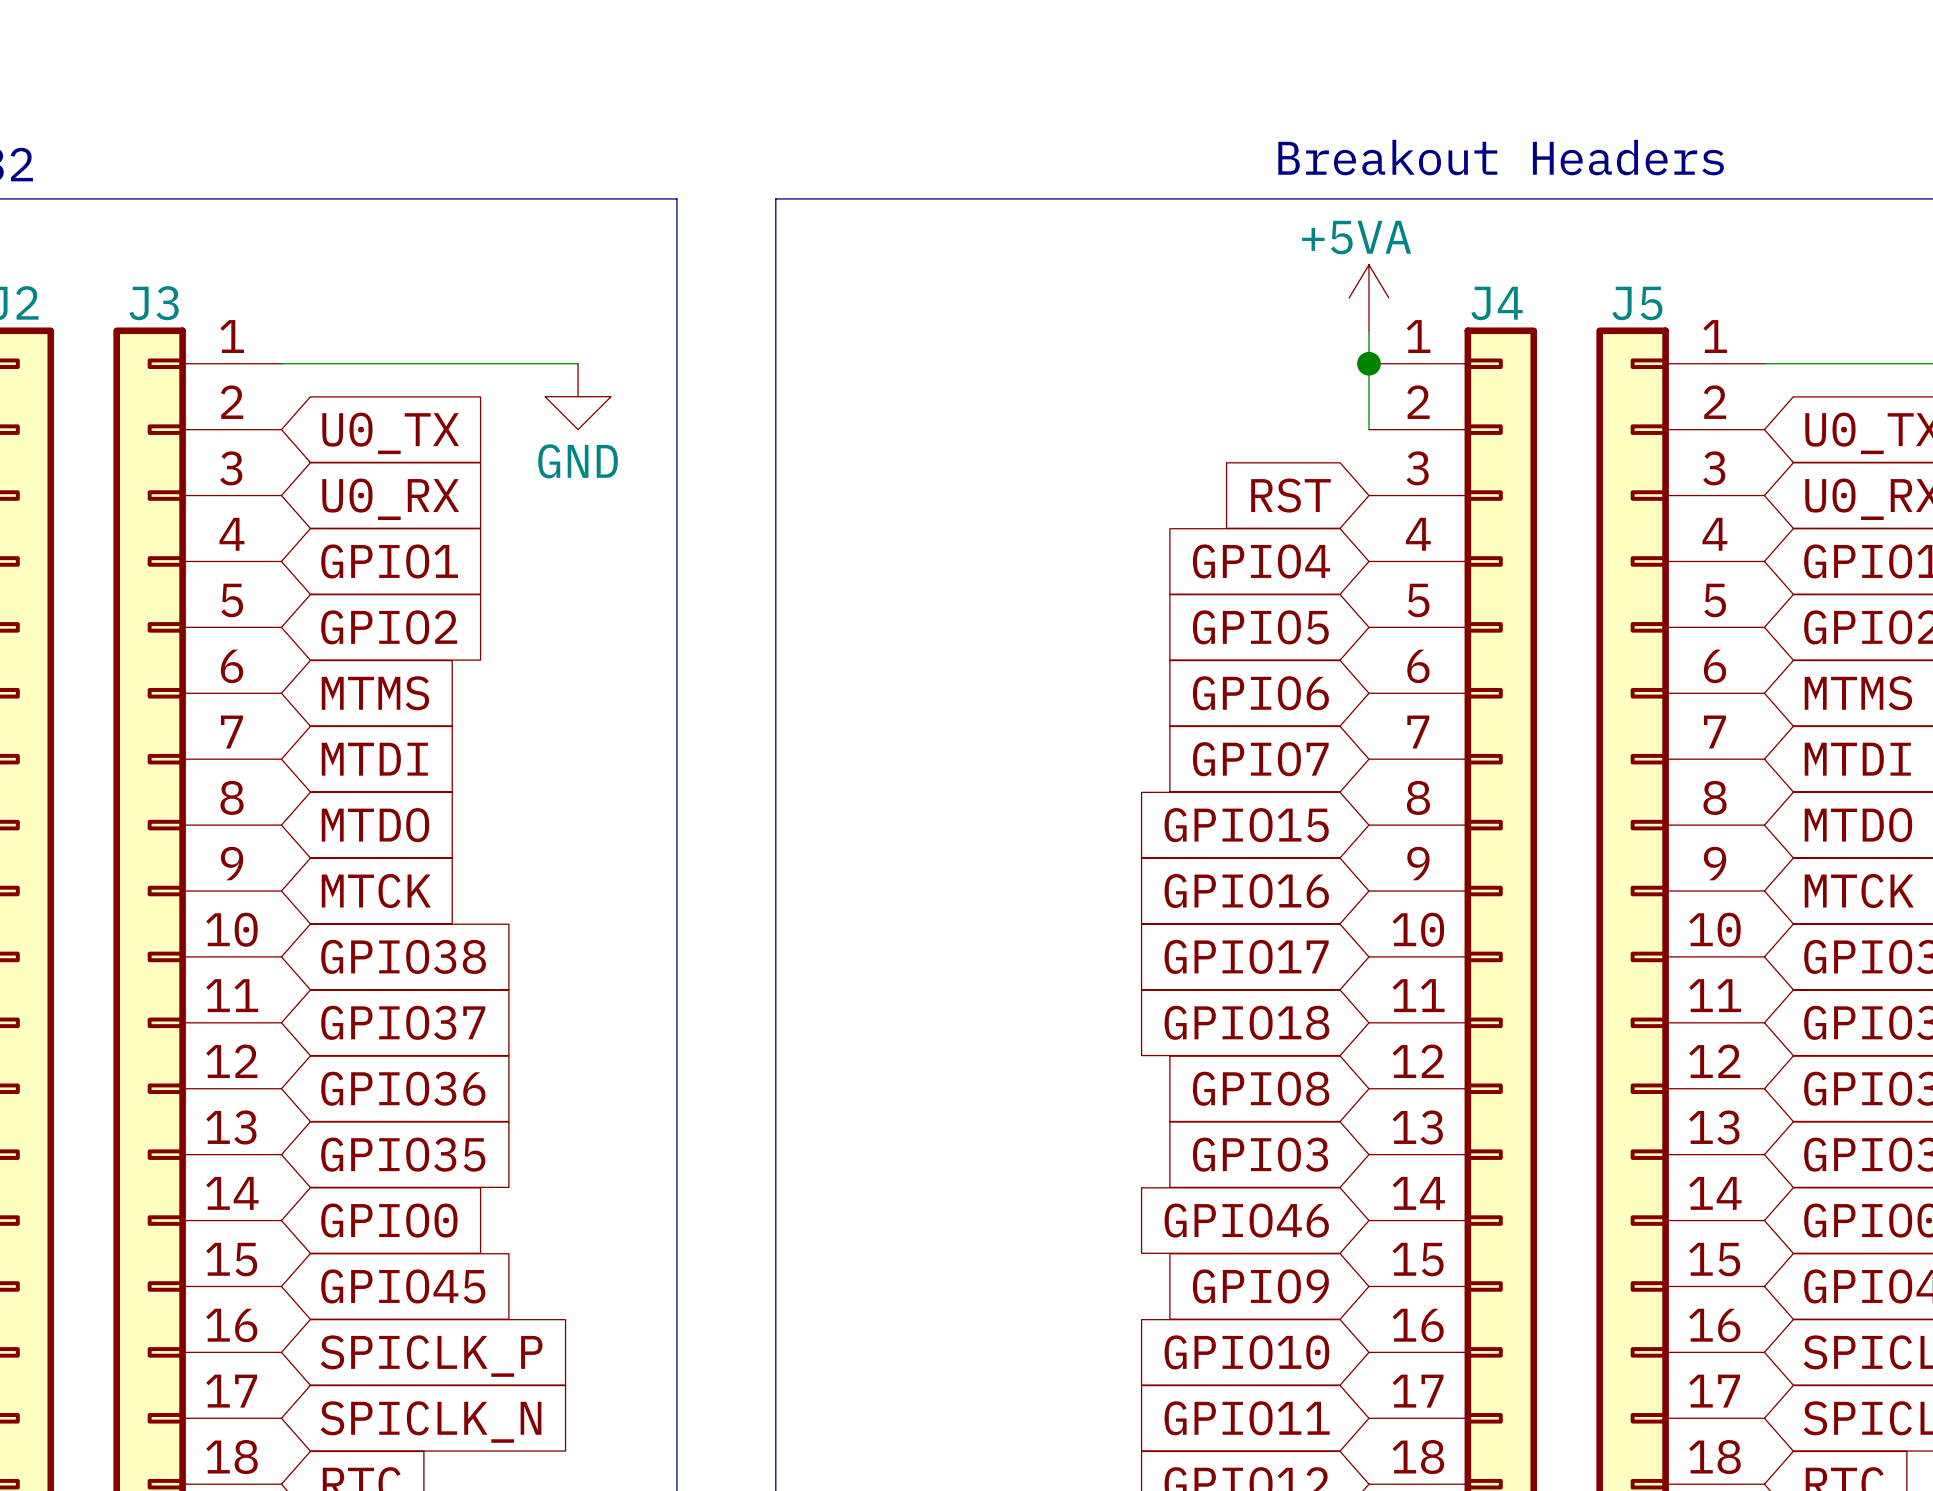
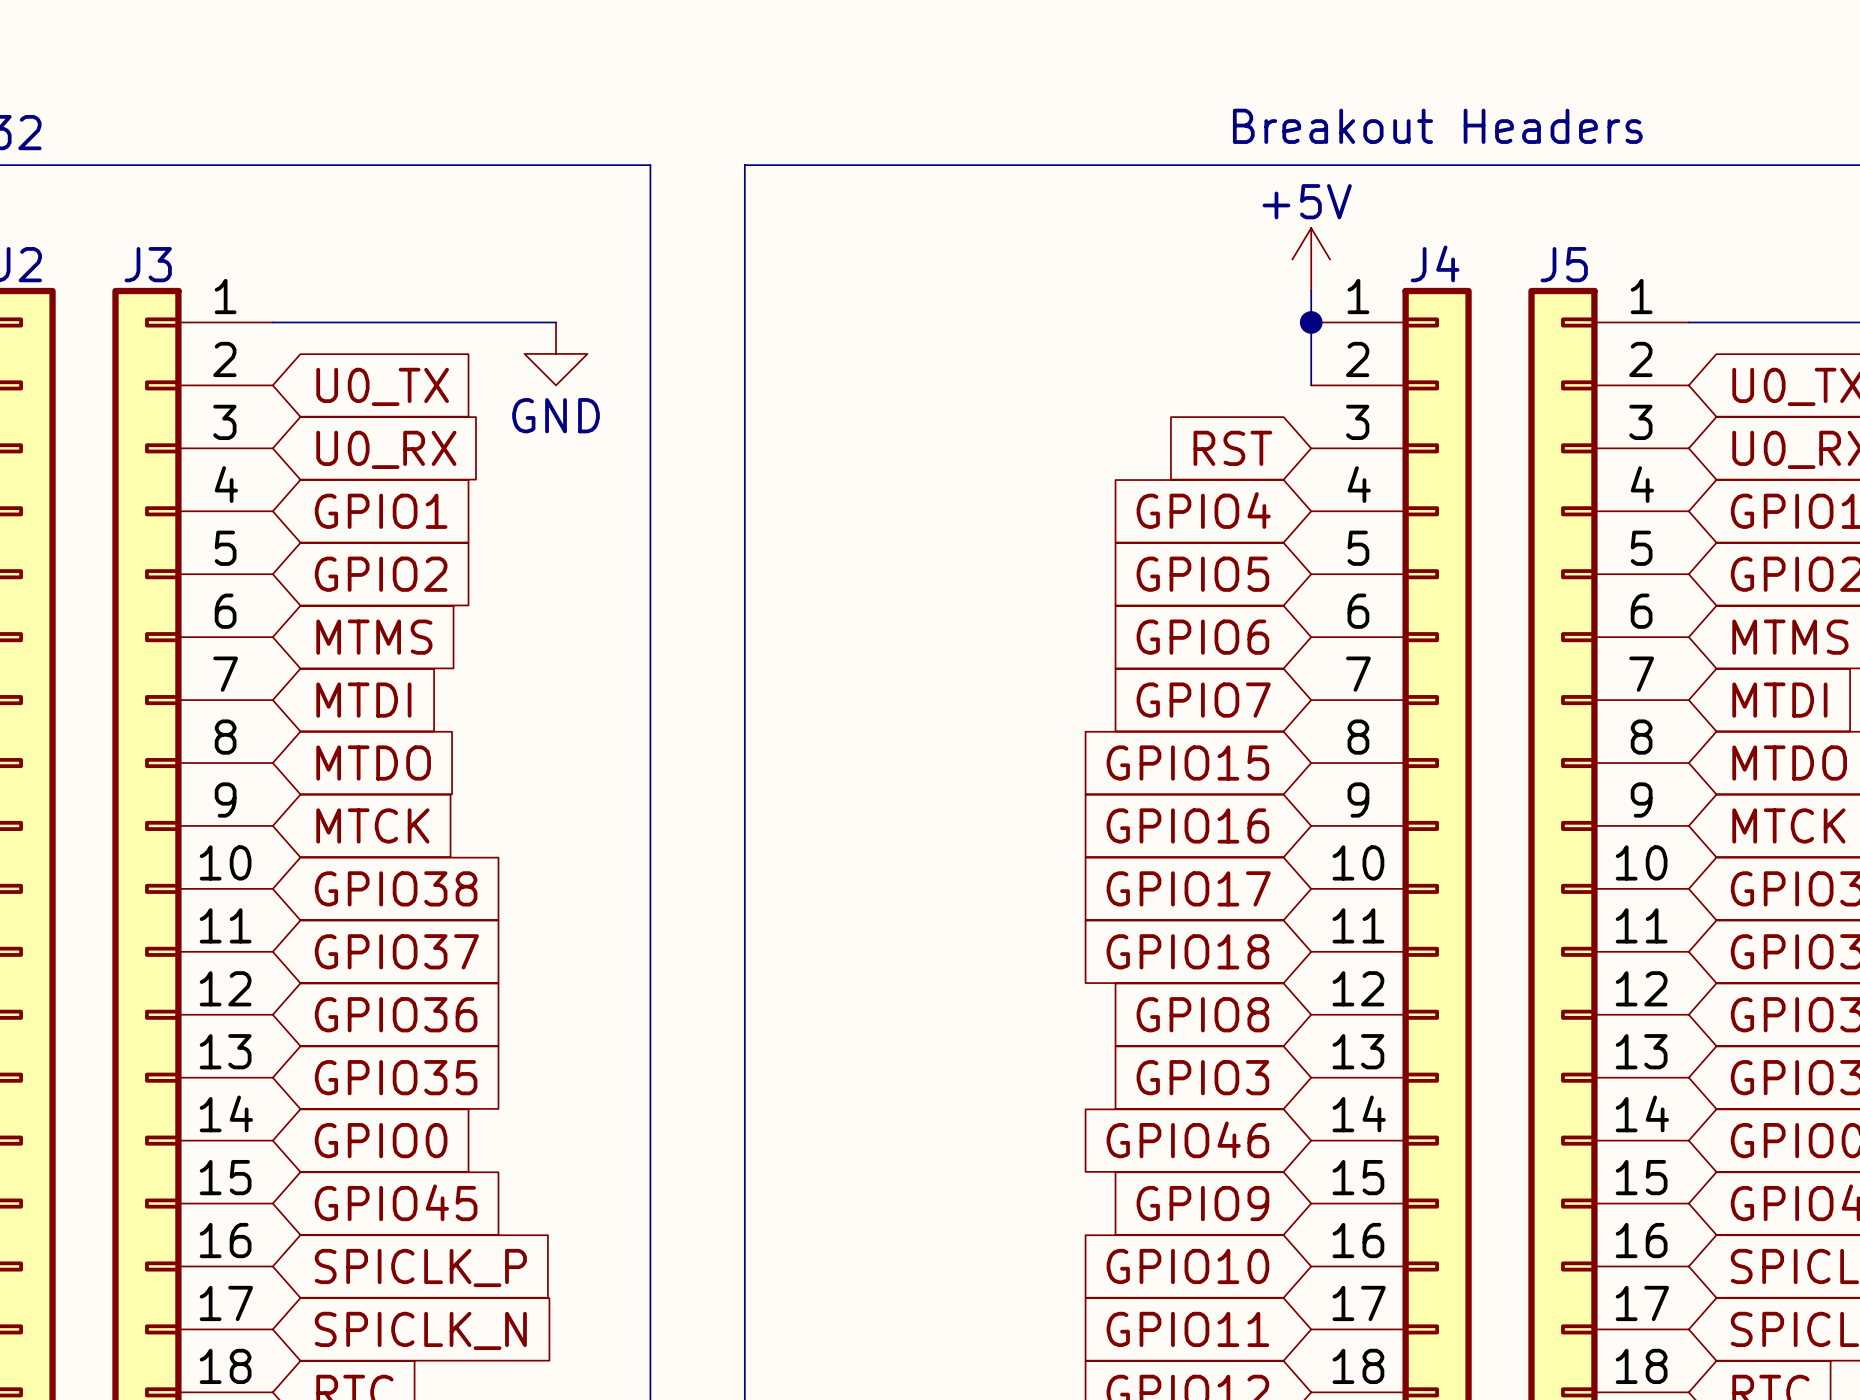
power symbol: +5VA (1368, 297) -> +5V (1311, 259)

